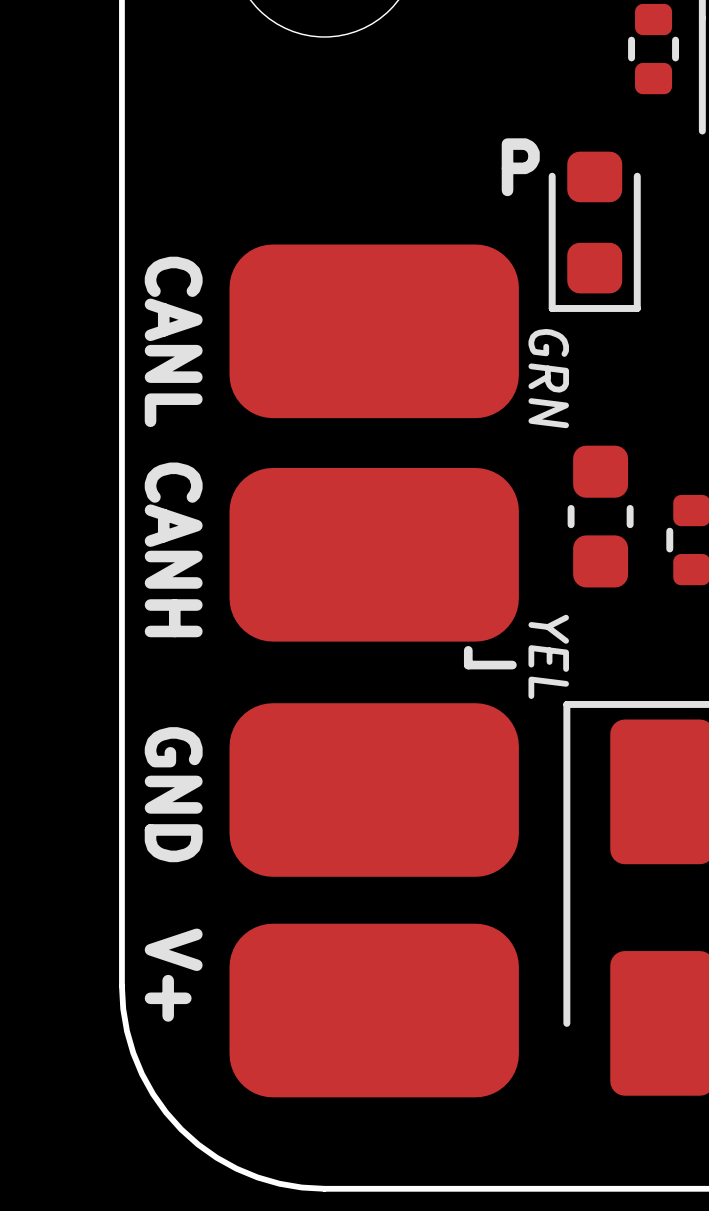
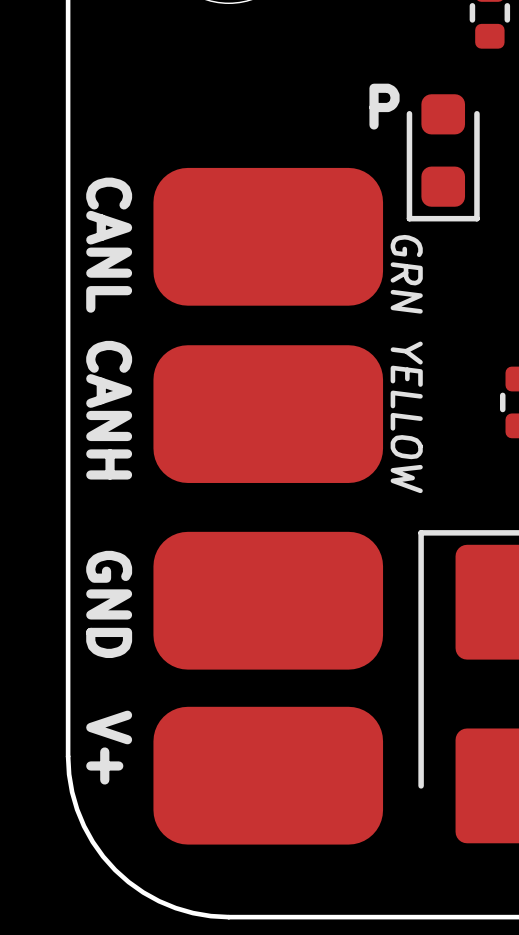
part: (600, 516) -> none
line: (468, 650) (468, 665) (512, 665) -> none
text: YEL (548, 656) -> YELLOW (406, 417)

